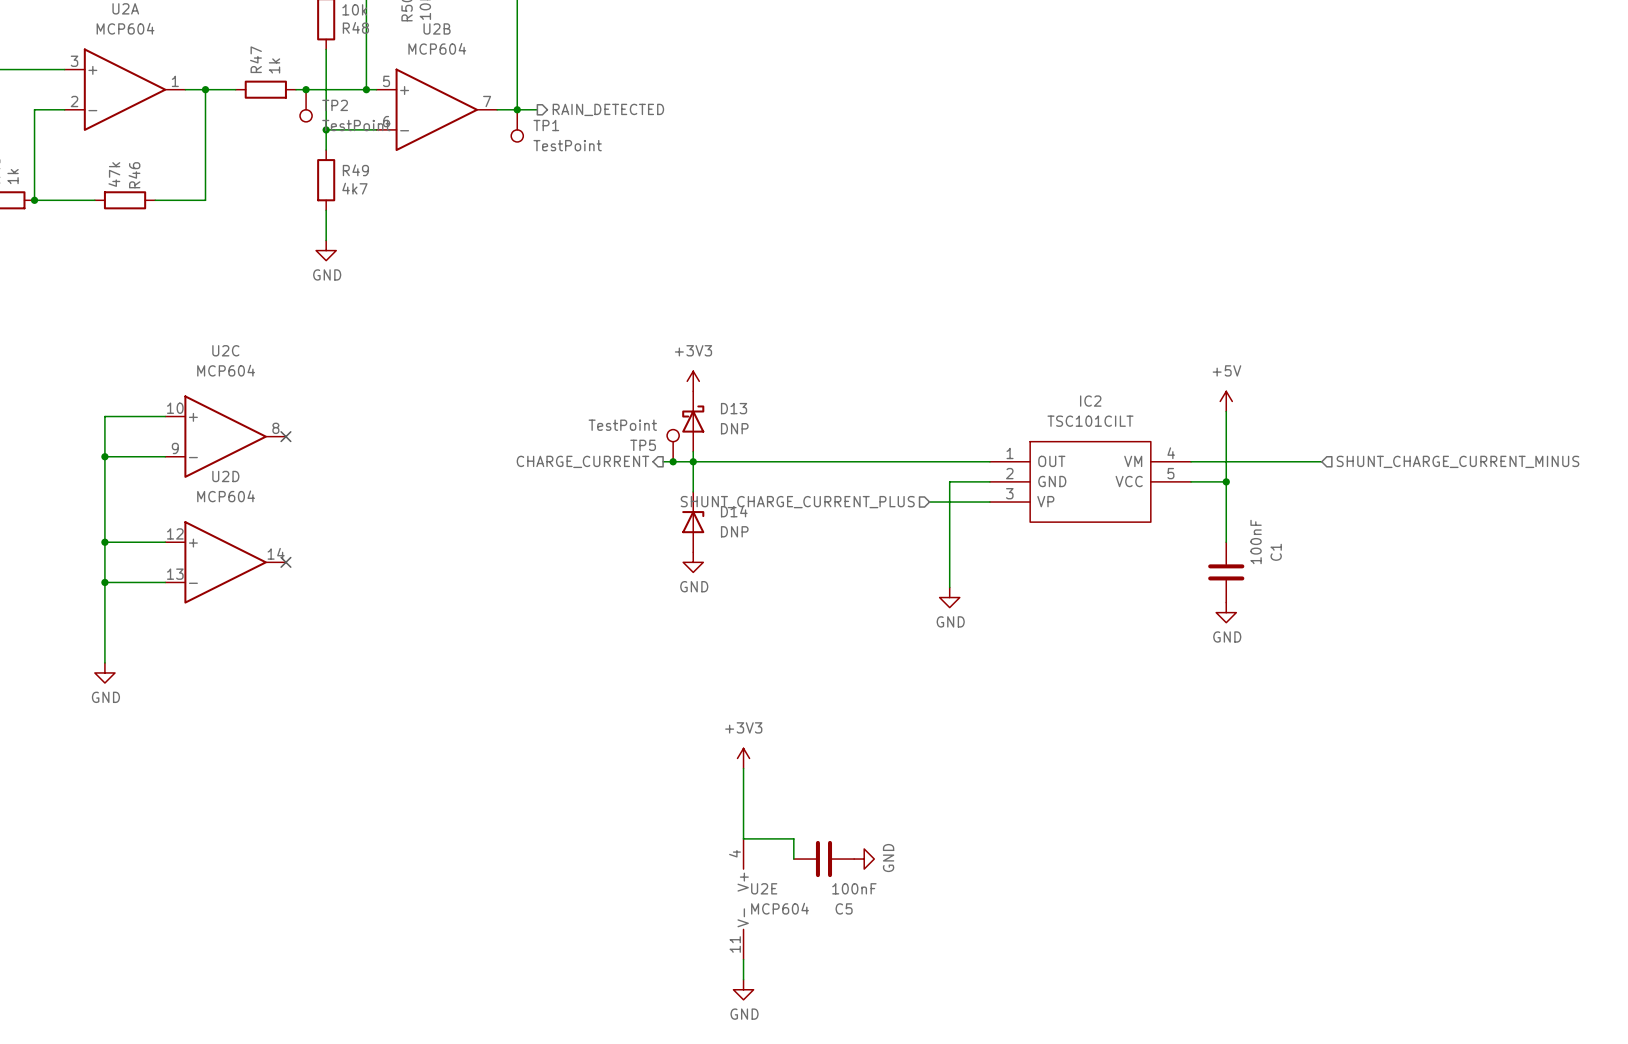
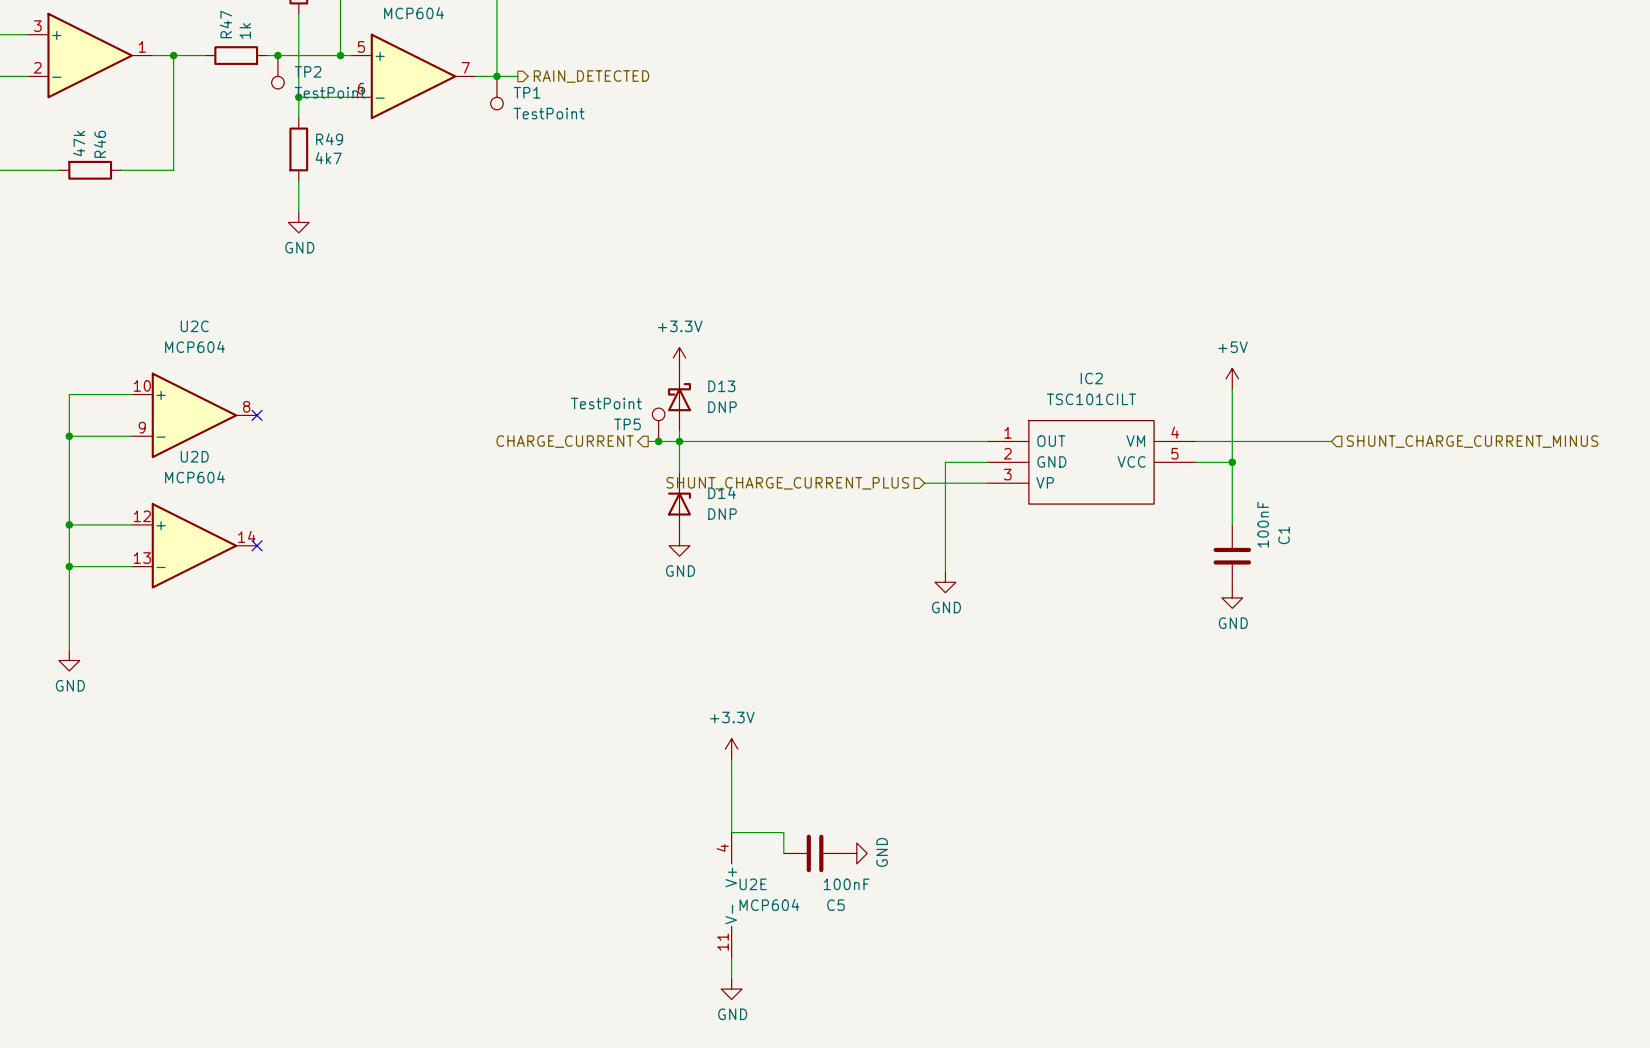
power symbol: +3V3 (693, 381) -> +3.3V (679, 358)
power symbol: +3V3 (743, 758) -> +3.3V (731, 749)

